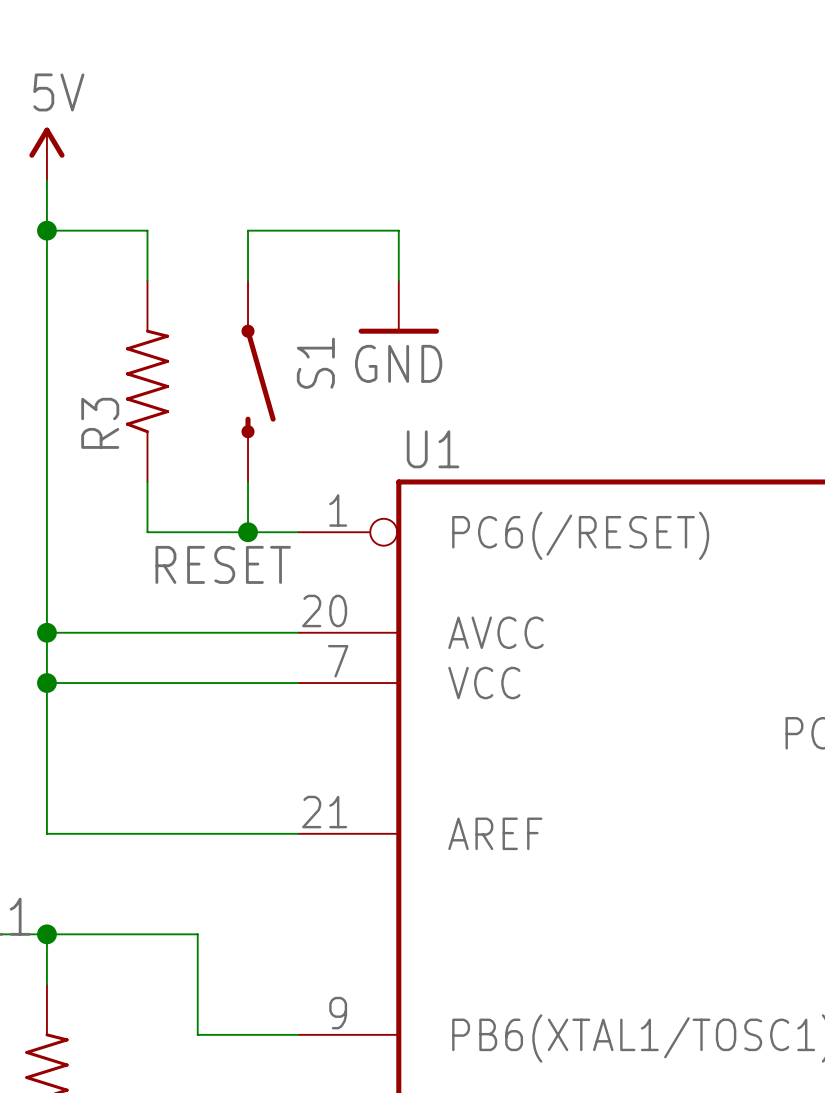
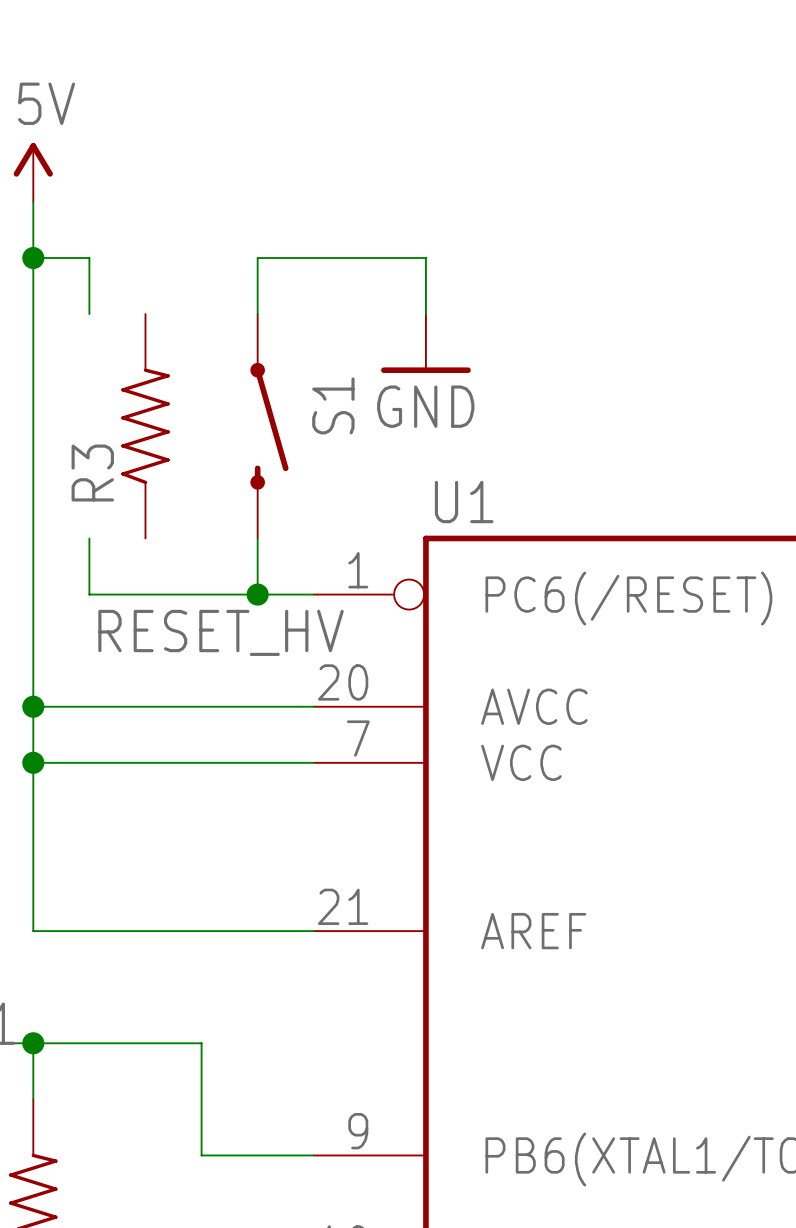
wire: (97, 230) (147, 230) (147, 280) -> (89, 258) (89, 314)
wire: (147, 481) (147, 532) -> (89, 538) (89, 594) (145, 594)
label: RESET (223, 564) -> RESET_HV (221, 632)

